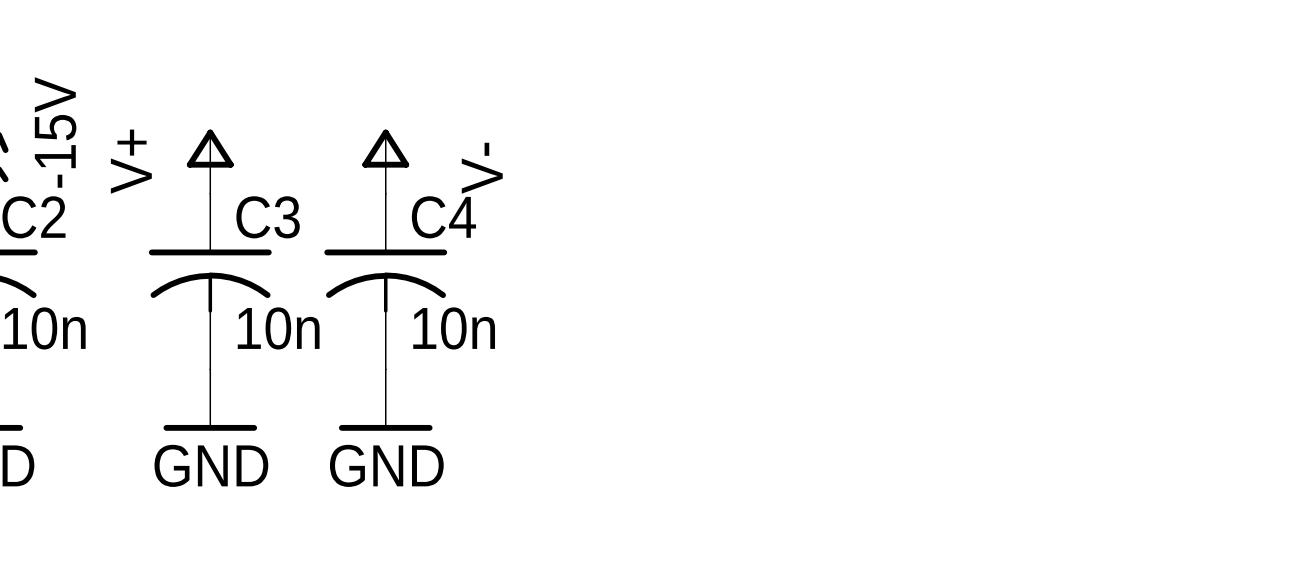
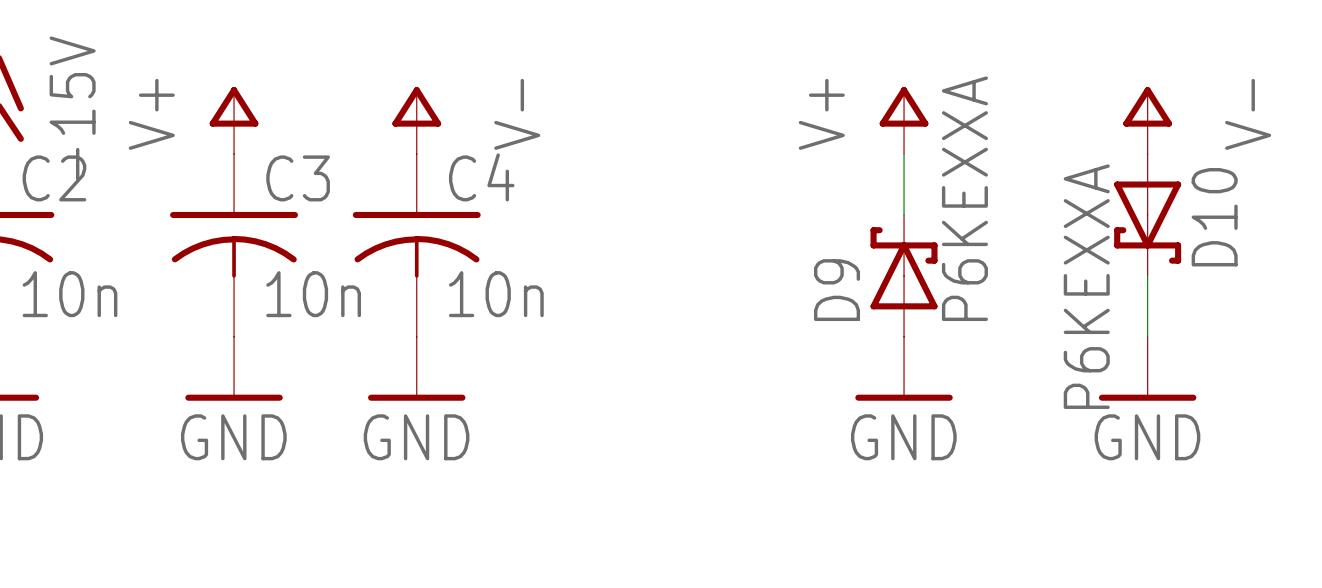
power symbol: none -> V+ (904, 120)
power symbol: none -> V- (1147, 120)
wire: none -> (904, 154) (904, 214)
D10: none -> P6KEXXA (1147, 214)
D9: none -> P6KEXXA (904, 275)
wire: none -> (1147, 275) (1147, 336)
power symbol: none -> GND (904, 368)
power symbol: none -> GND (1147, 368)

